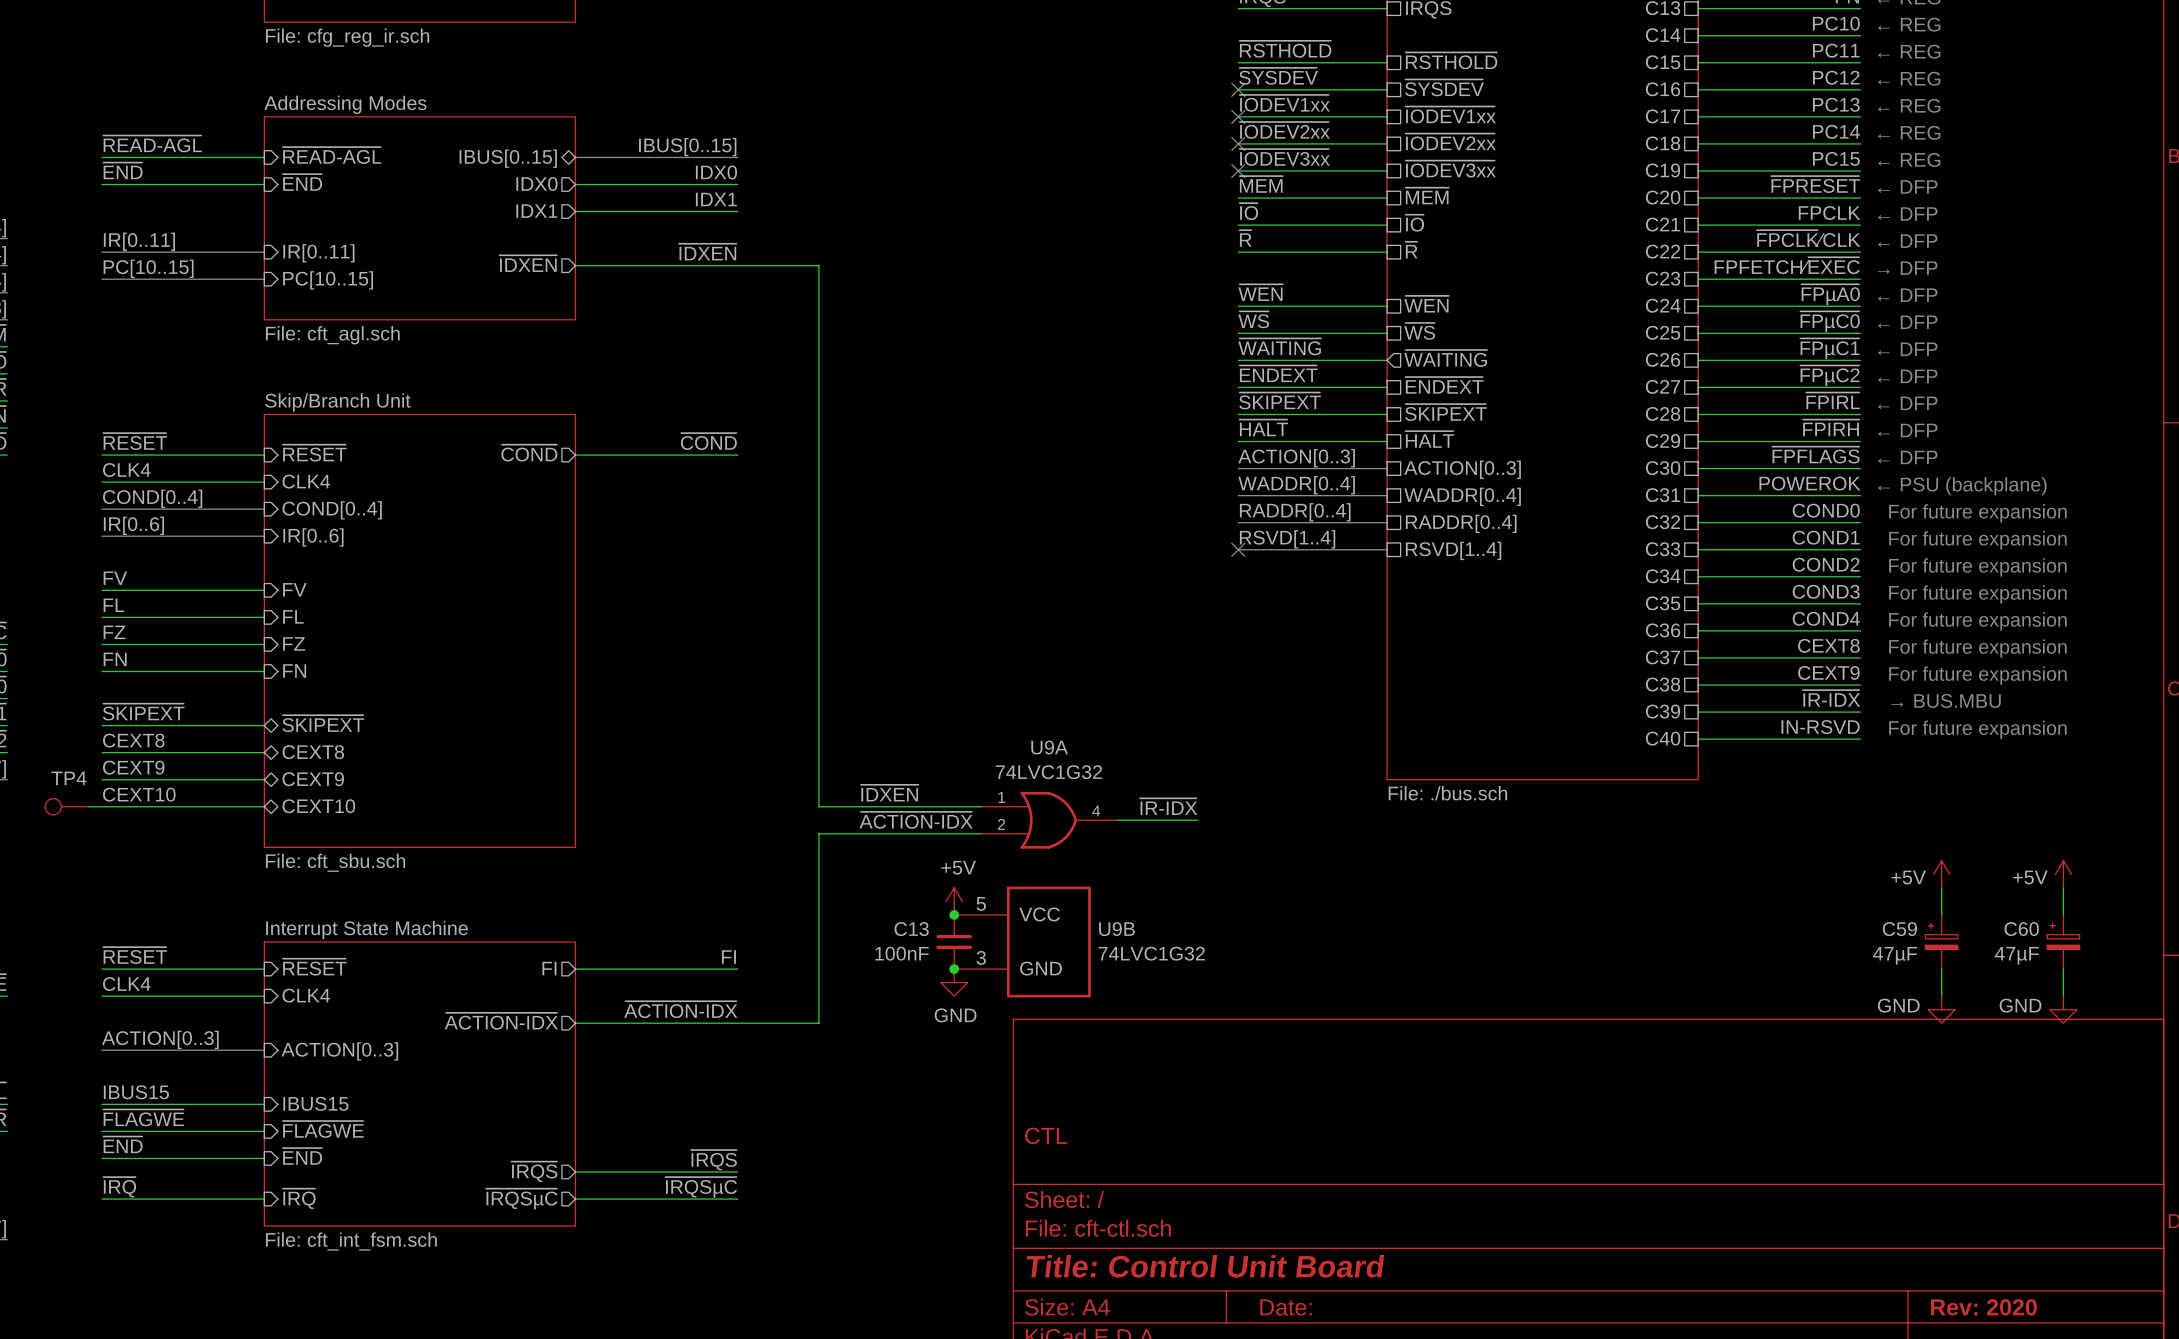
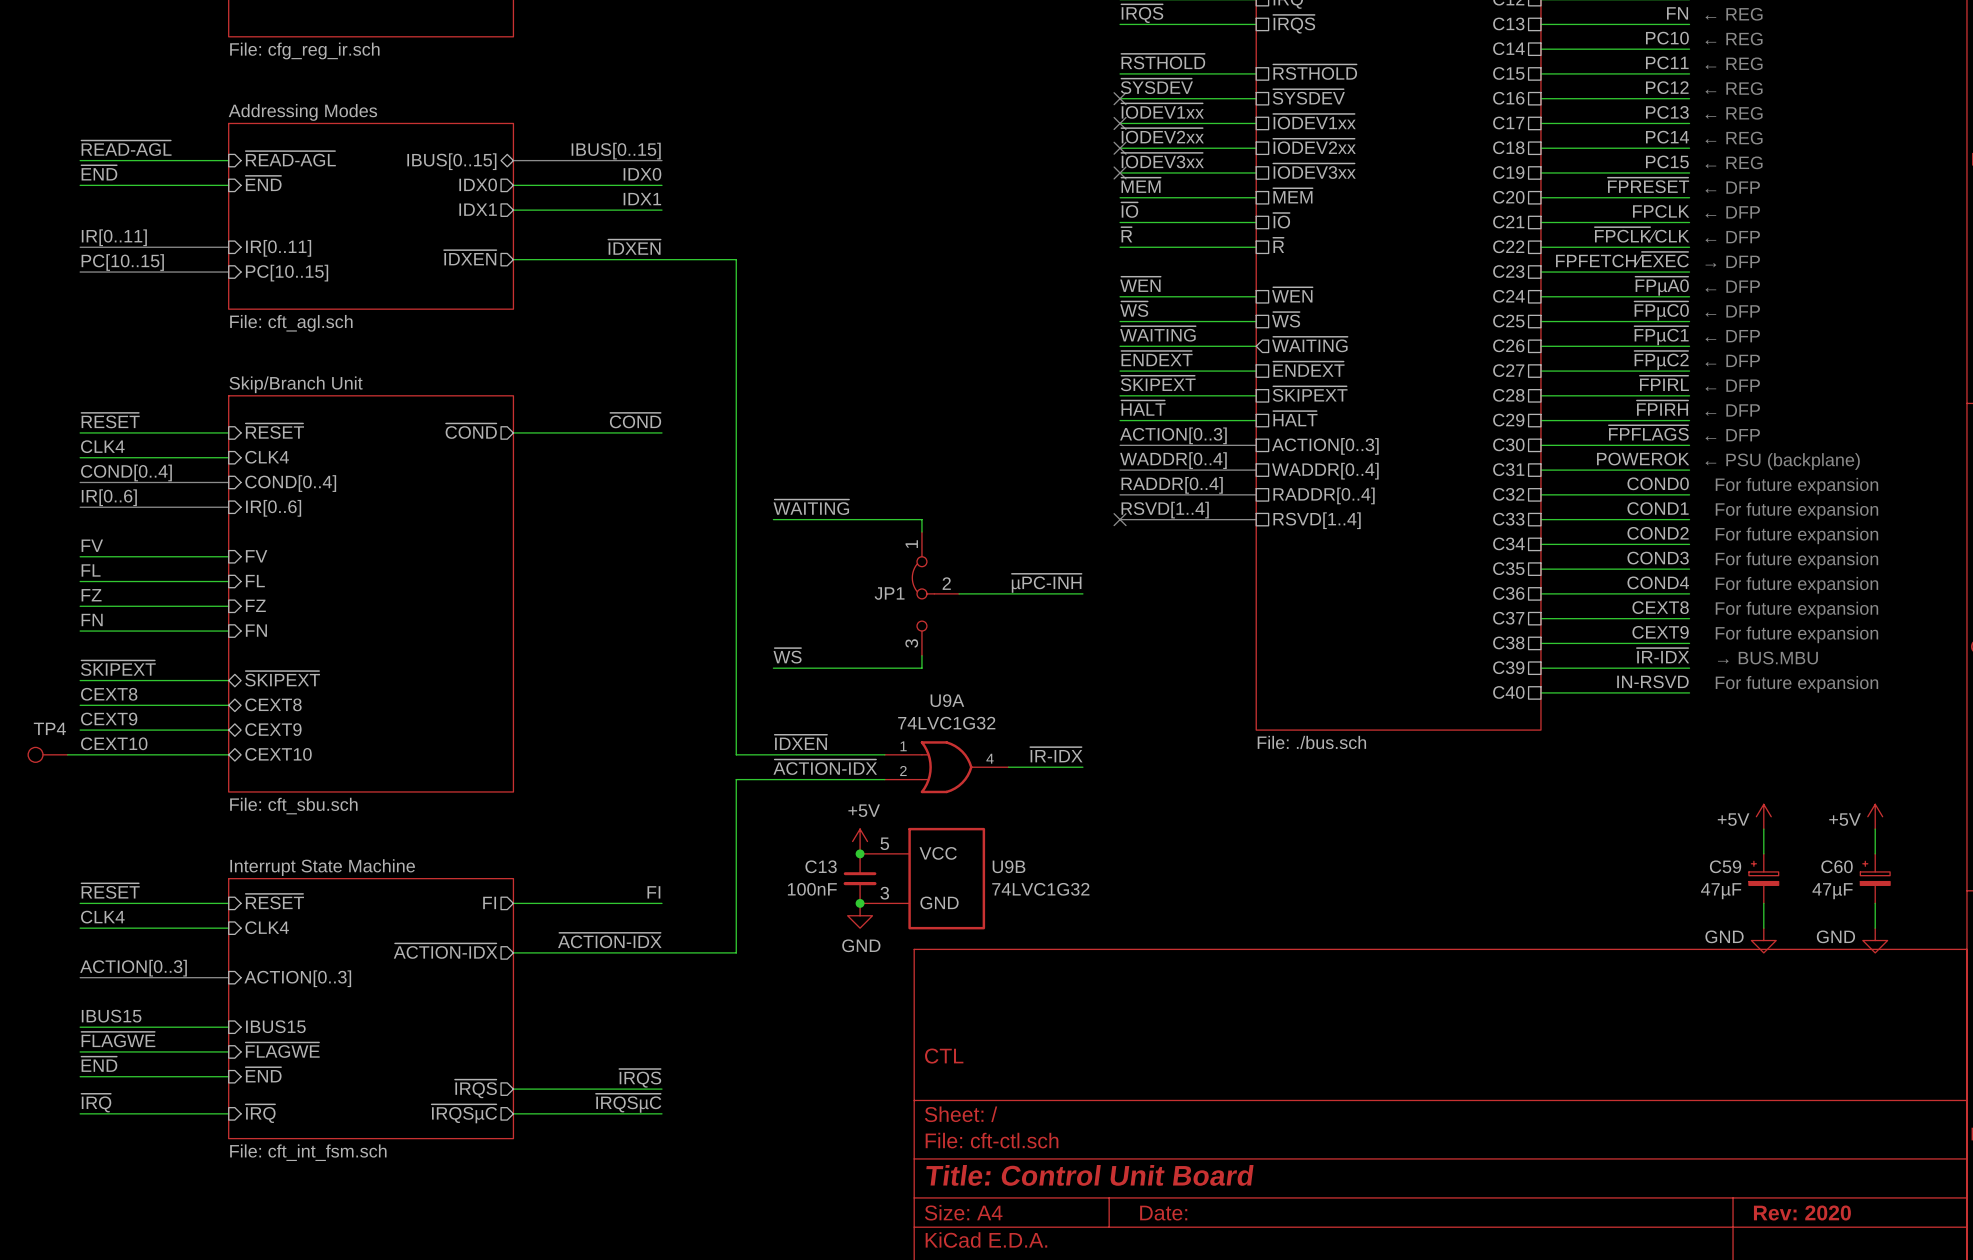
label: none -> ~{WAITING} (811, 507)
wire: none -> (773, 519) (921, 519) (921, 532)
label: none -> ~{µPC-INH} (1046, 583)
JP1: none -> (935, 593)
wire: none -> (959, 593) (1082, 593)
label: none -> ~{WS} (787, 655)
wire: none -> (921, 655) (921, 668) (773, 668)

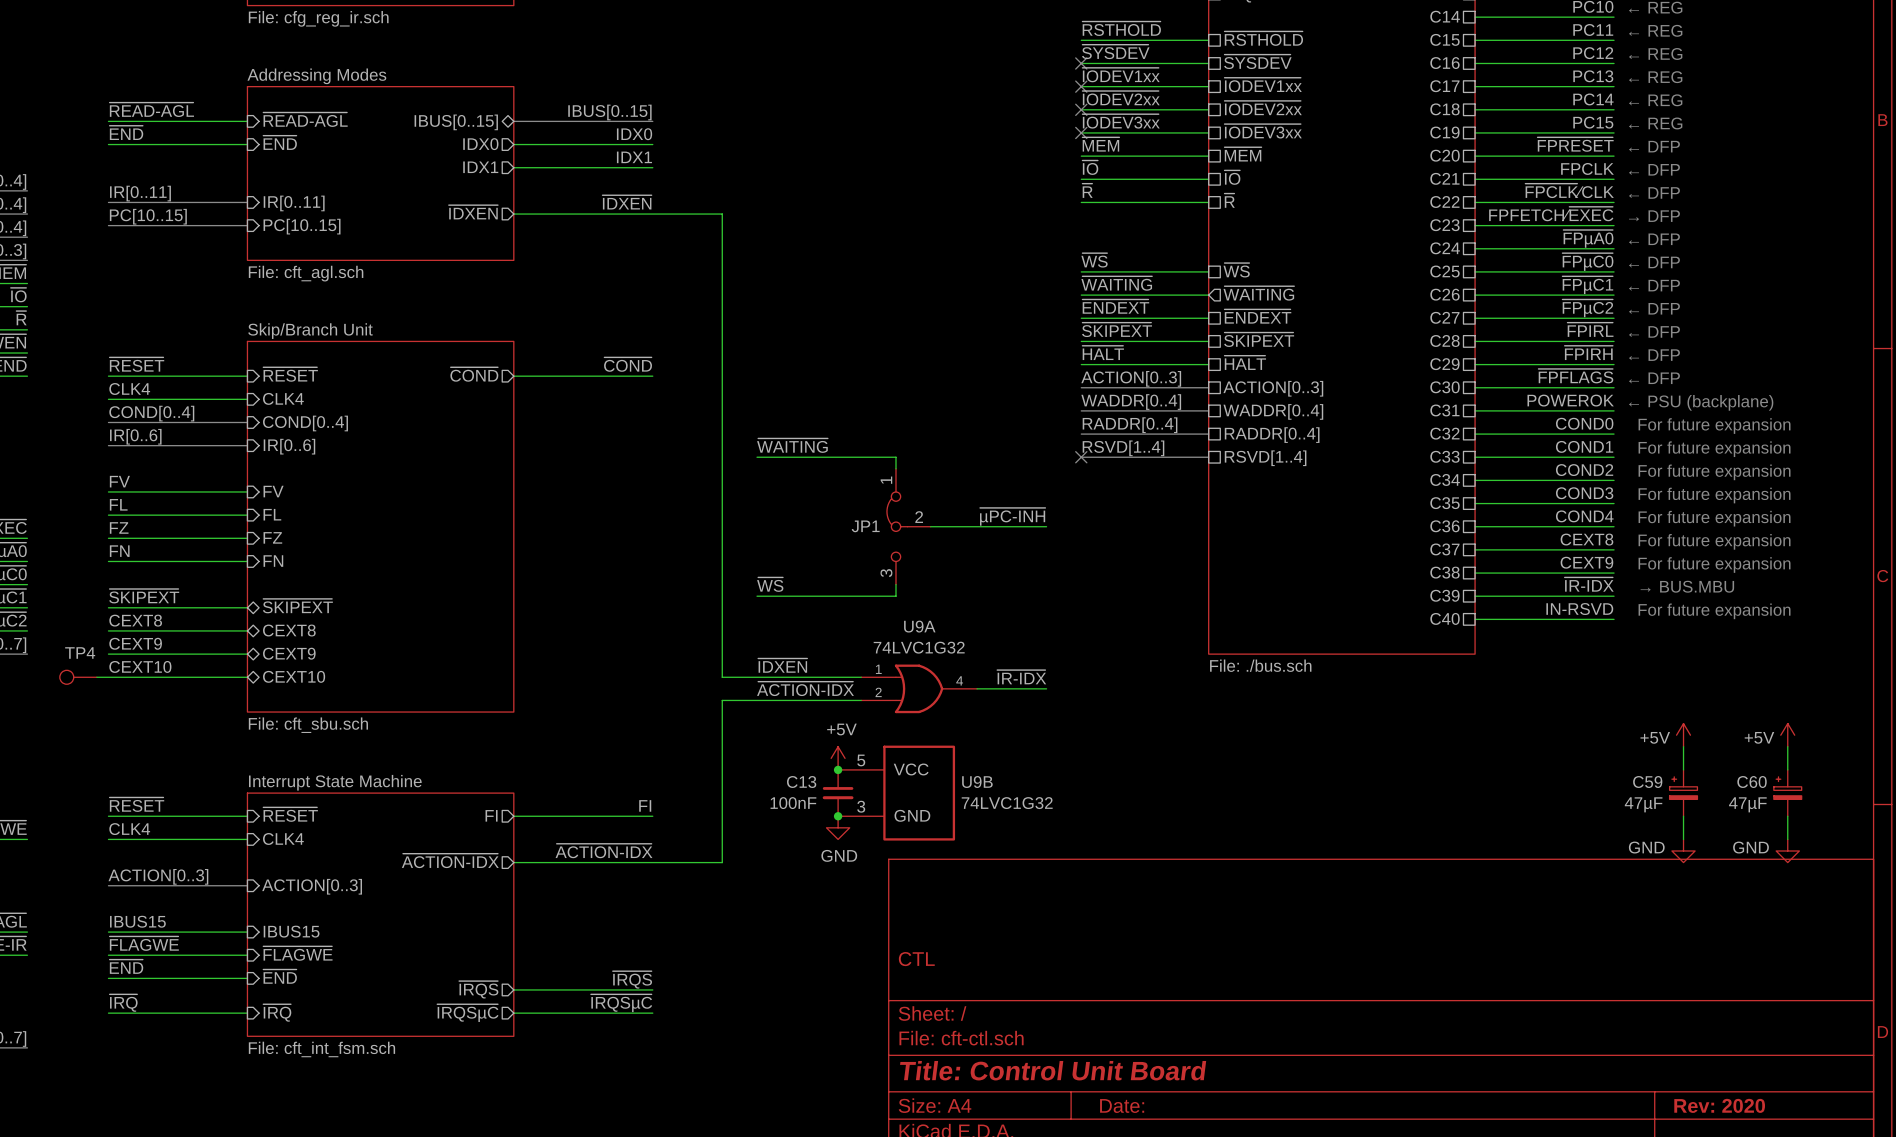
label: ~{WEN} (1140, 284) -> none
sheet pin: ~{WEN} (1292, 294) -> none
wire: (1120, 296) (1256, 296) -> none

